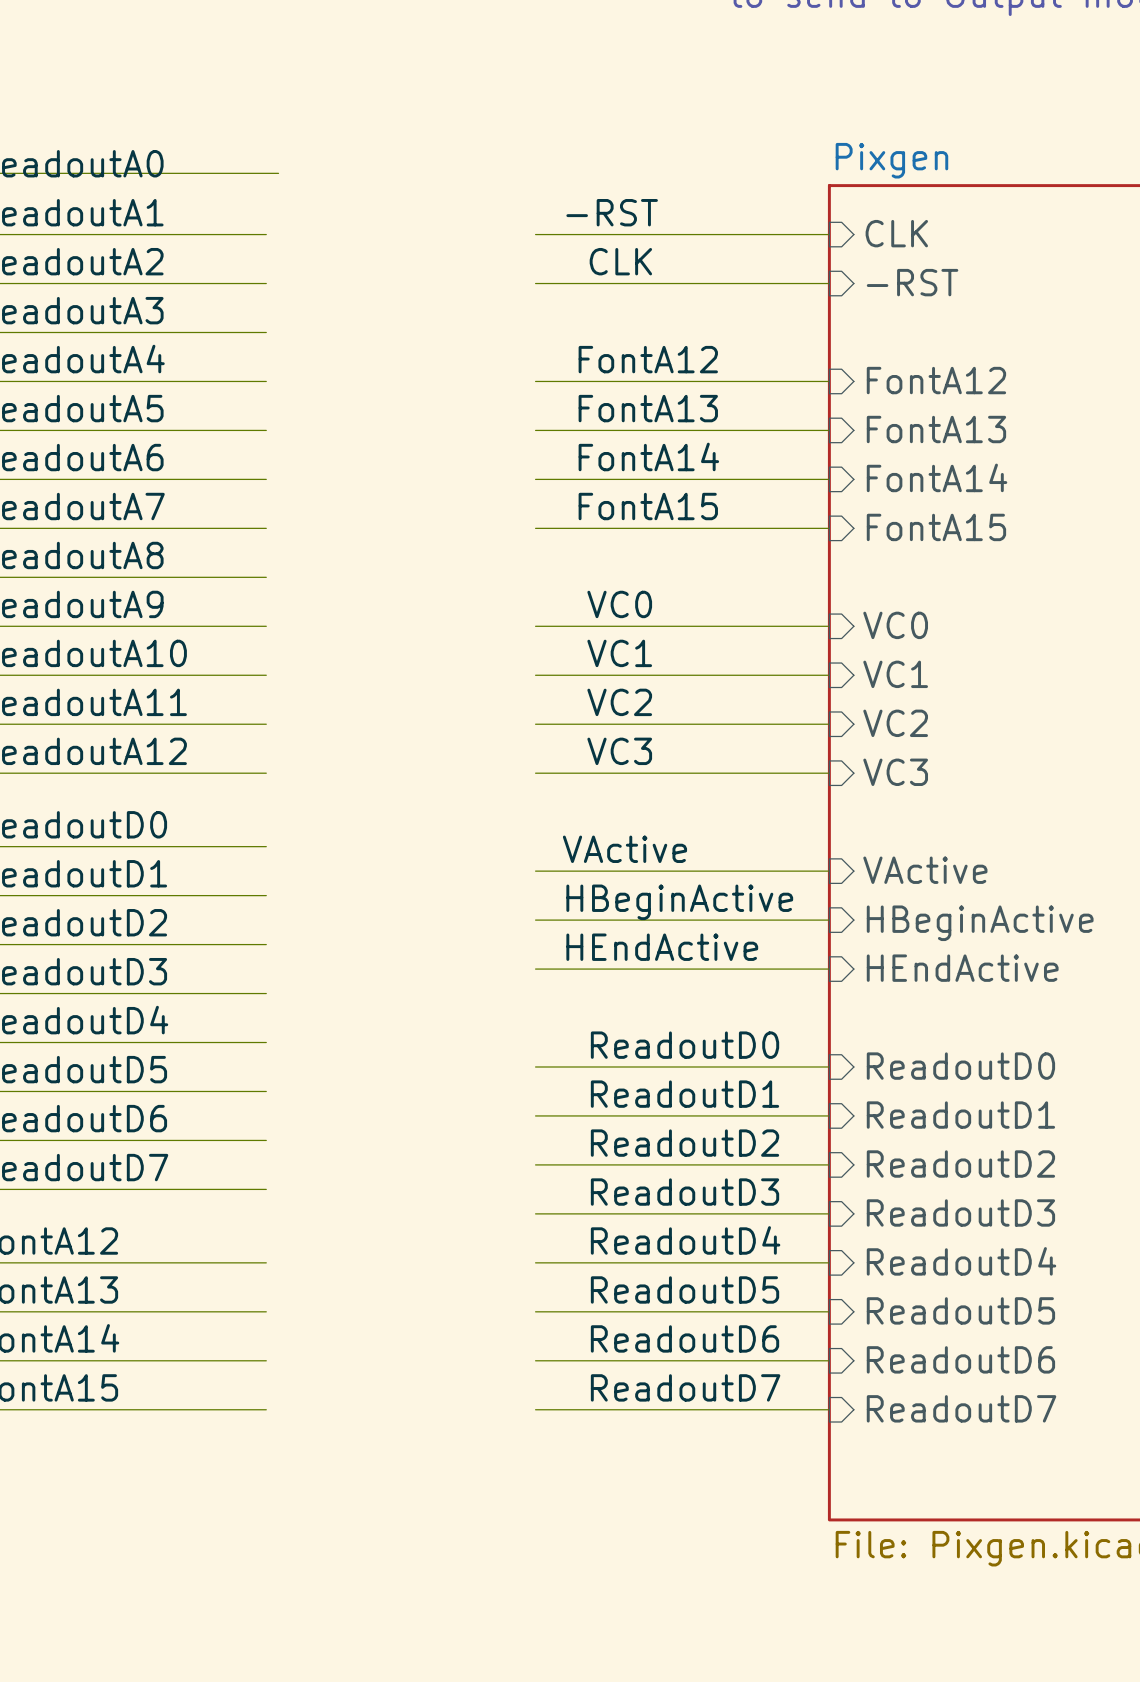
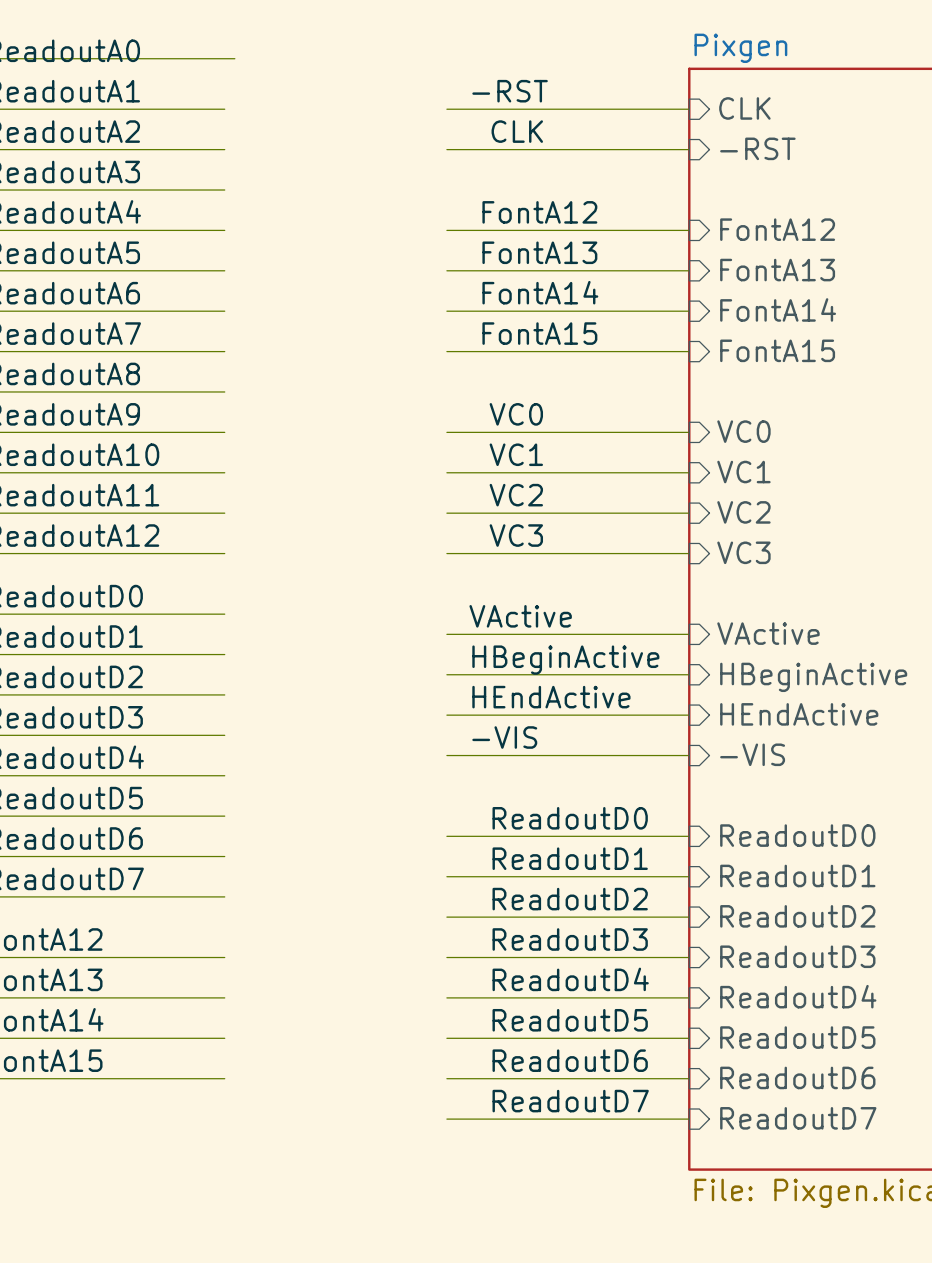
label: none -> -VIS (504, 737)
sheet pin: none -> -VIS (752, 754)
label: ReadoutD0 (685, 1045) -> none
wire: (535, 1066) (829, 1066) -> (446, 755) (689, 755)
sheet pin: ReadoutD0 (960, 1066) -> none
label: ReadoutD1 (685, 1094) -> ReadoutD0 (570, 818)
sheet pin: ReadoutD1 (960, 1115) -> ReadoutD0 (797, 835)
label: ReadoutD2 (685, 1143) -> ReadoutD1 (570, 858)
sheet pin: ReadoutD2 (960, 1164) -> ReadoutD1 (797, 875)
label: ReadoutD3 (685, 1192) -> ReadoutD2 (570, 899)
sheet pin: ReadoutD3 (960, 1212) -> ReadoutD2 (797, 916)
label: ReadoutD4 (685, 1240) -> ReadoutD3 (570, 939)
sheet pin: ReadoutD4 (961, 1261) -> ReadoutD3 (797, 956)
label: ReadoutD5 (685, 1289) -> ReadoutD4 (570, 979)
sheet pin: ReadoutD5 (960, 1310) -> ReadoutD4 (798, 996)
label: ReadoutD6 (685, 1338) -> ReadoutD5 (570, 1020)
sheet pin: ReadoutD6 (960, 1359) -> ReadoutD5 (797, 1037)
label: ReadoutD7 (685, 1387) -> ReadoutD6 (570, 1060)
sheet pin: ReadoutD7 (961, 1408) -> ReadoutD6 (797, 1077)
label: none -> ReadoutD7 (570, 1101)
sheet pin: none -> ReadoutD7 (798, 1118)
wire: none -> (446, 1119) (689, 1119)

